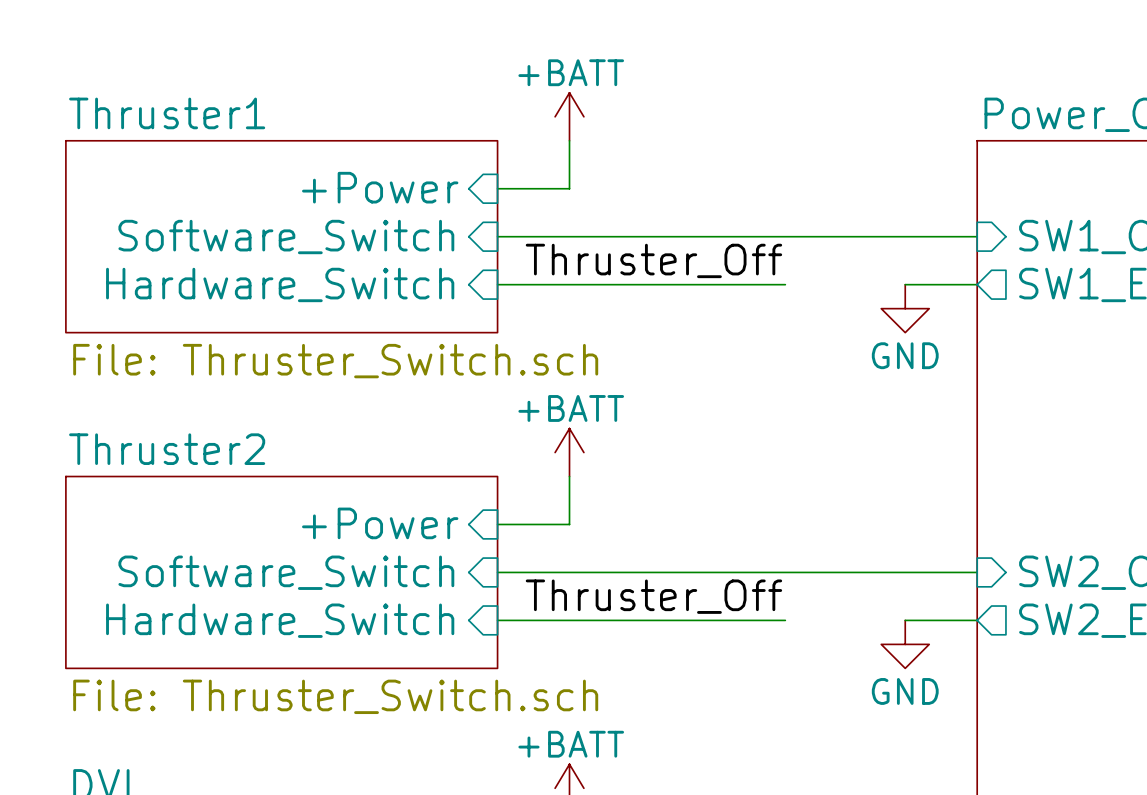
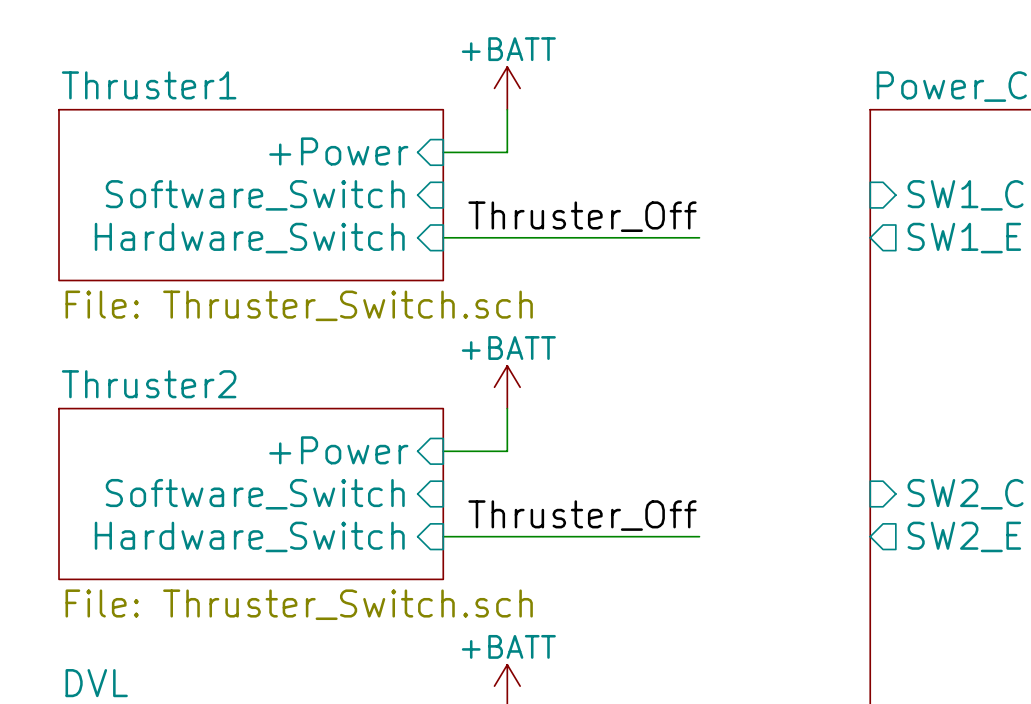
wire: (497, 236) (977, 236) -> none
wire: (905, 284) (977, 284) -> none
power symbol: GND (905, 308) -> none
wire: (497, 572) (977, 572) -> none
wire: (905, 620) (977, 620) -> none
power symbol: GND (905, 644) -> none

